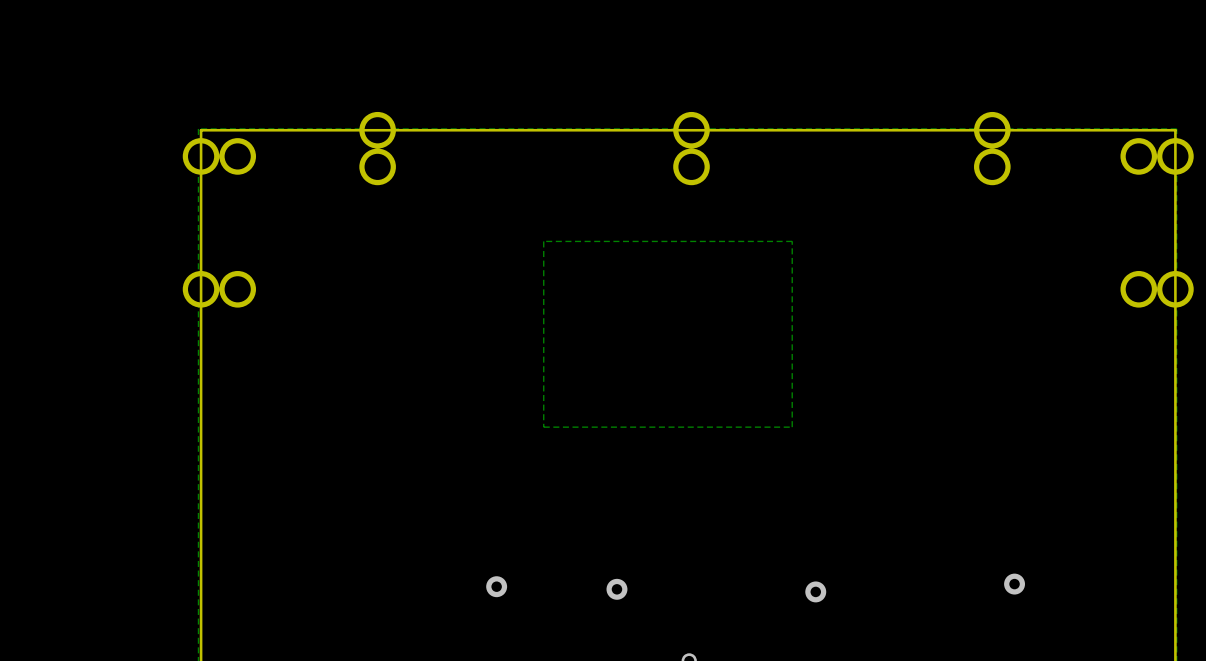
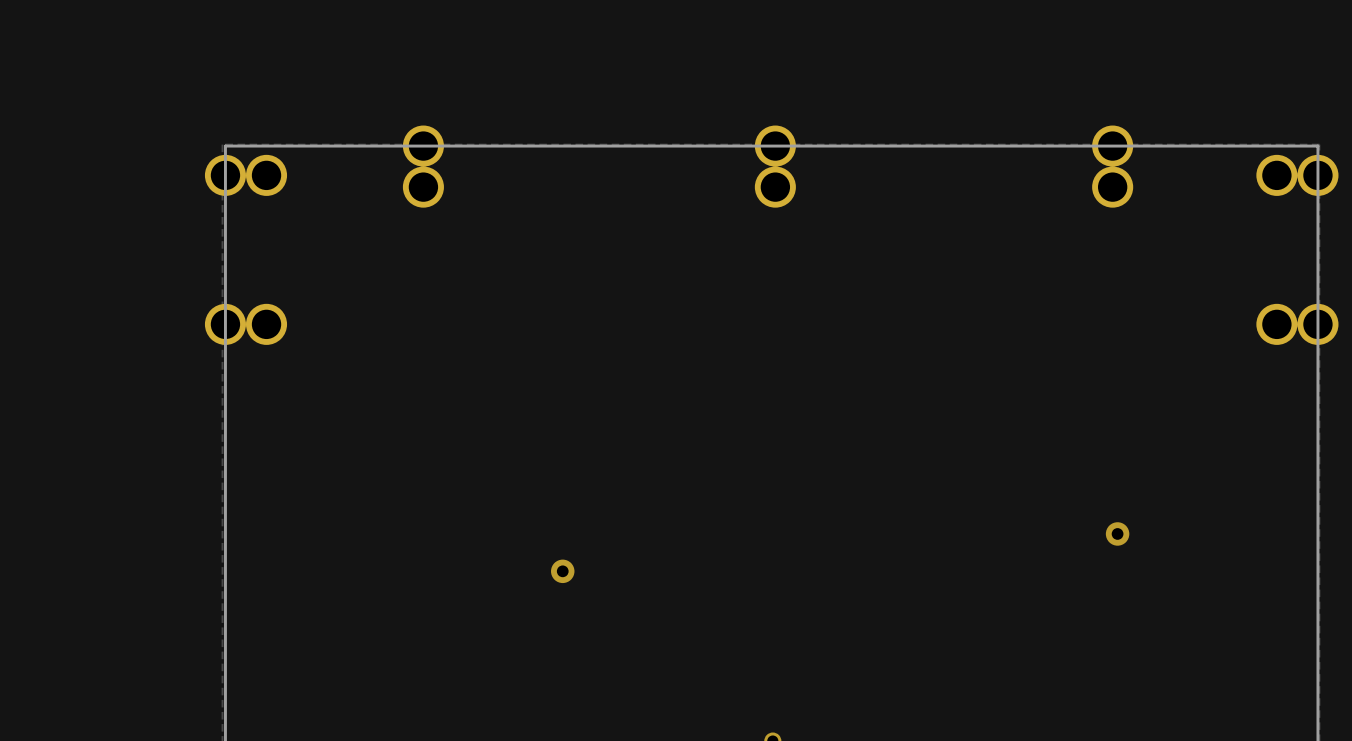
zone outline: (792, 241) (792, 427) (543, 427) (543, 241) (792, 241) -> none
via: none -> (1117, 533)
via: none -> (562, 571)
via: (1014, 584) -> none
via: (496, 586) -> none
via: (616, 589) -> none
via: (815, 591) -> none

